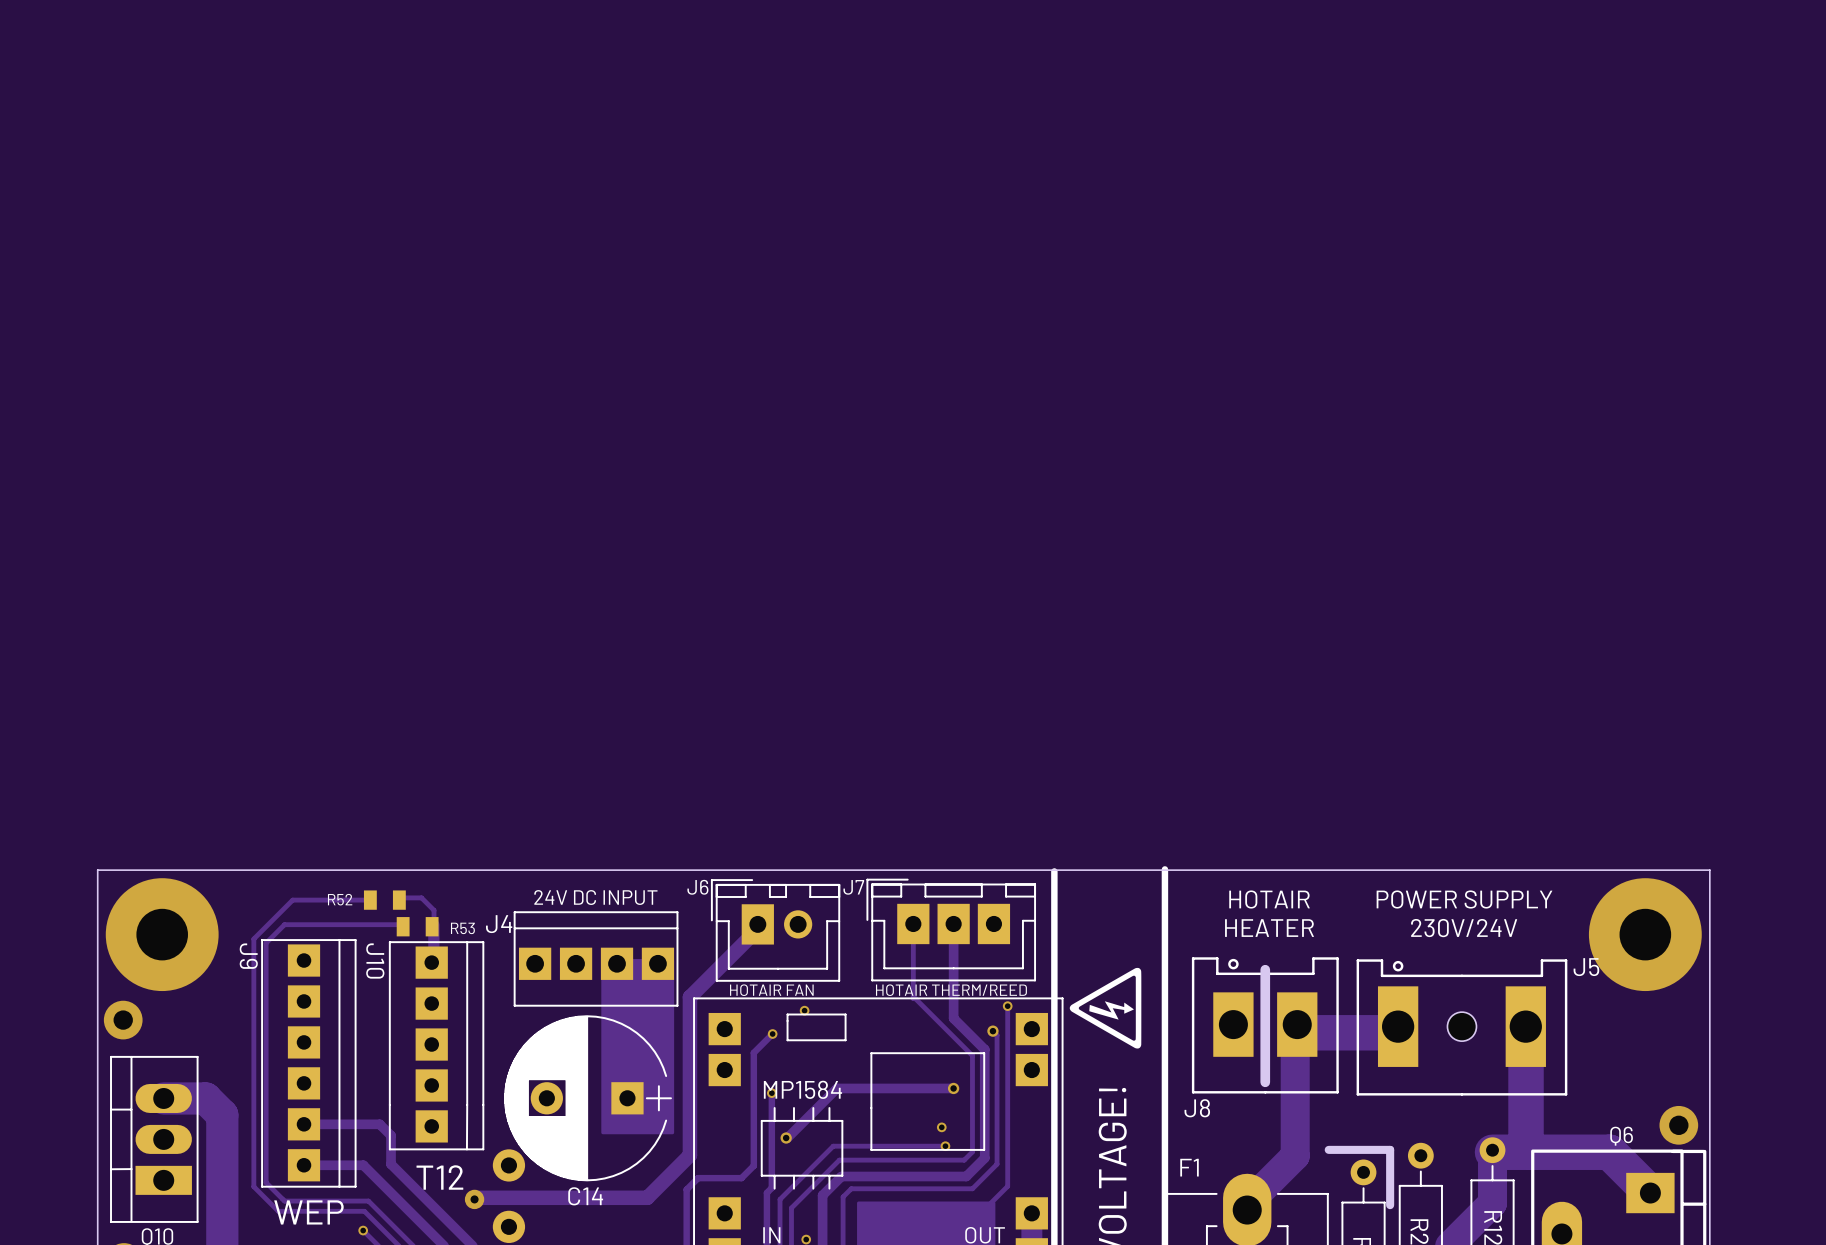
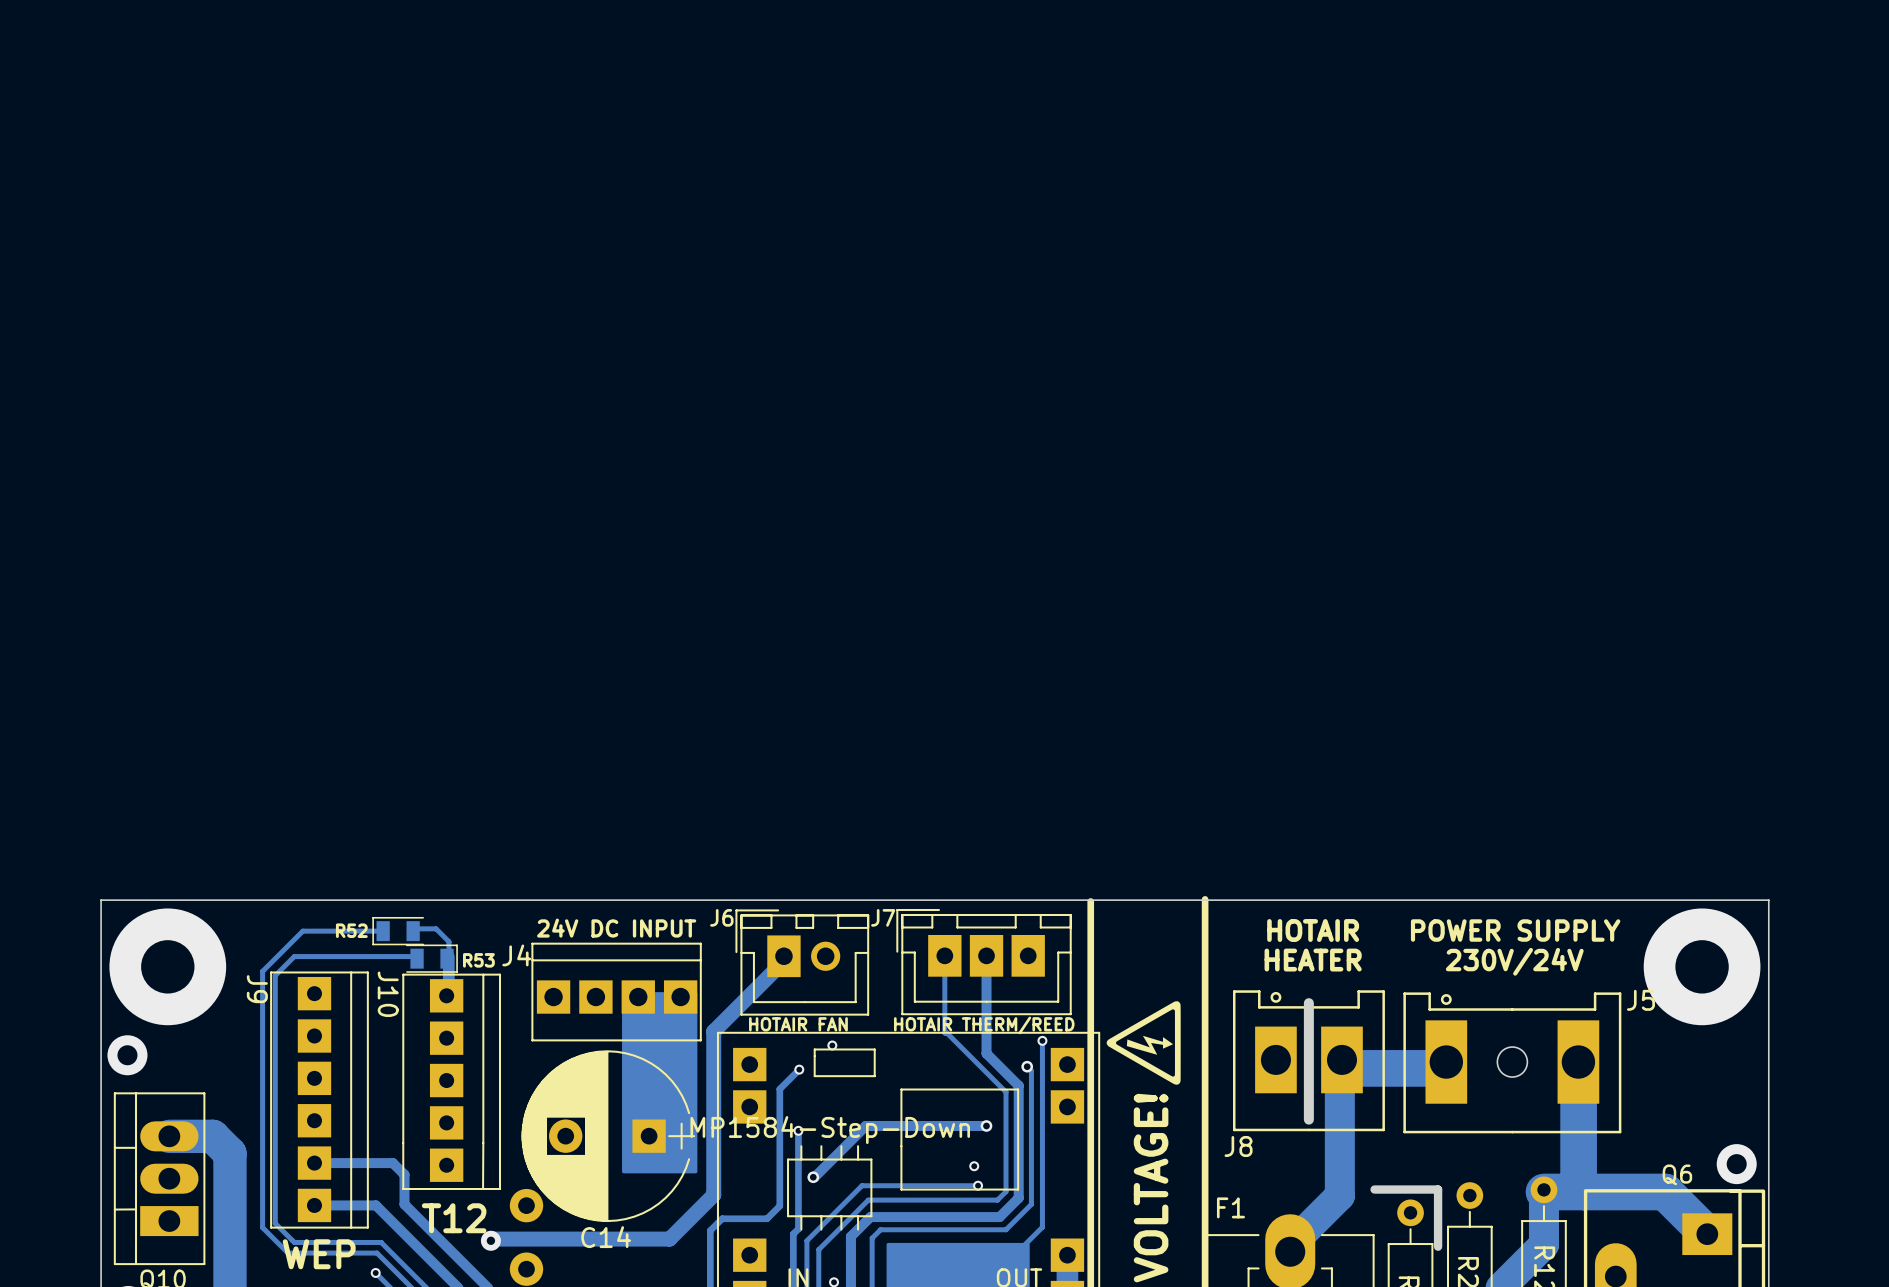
R52 footprint: [363, 890, 406, 910] -> [372, 917, 424, 946]
R53 footprint: [396, 917, 439, 937] -> [406, 944, 458, 973]
part value: MP1584 (802, 1089) -> MP1584-Step-Down (830, 1130)

